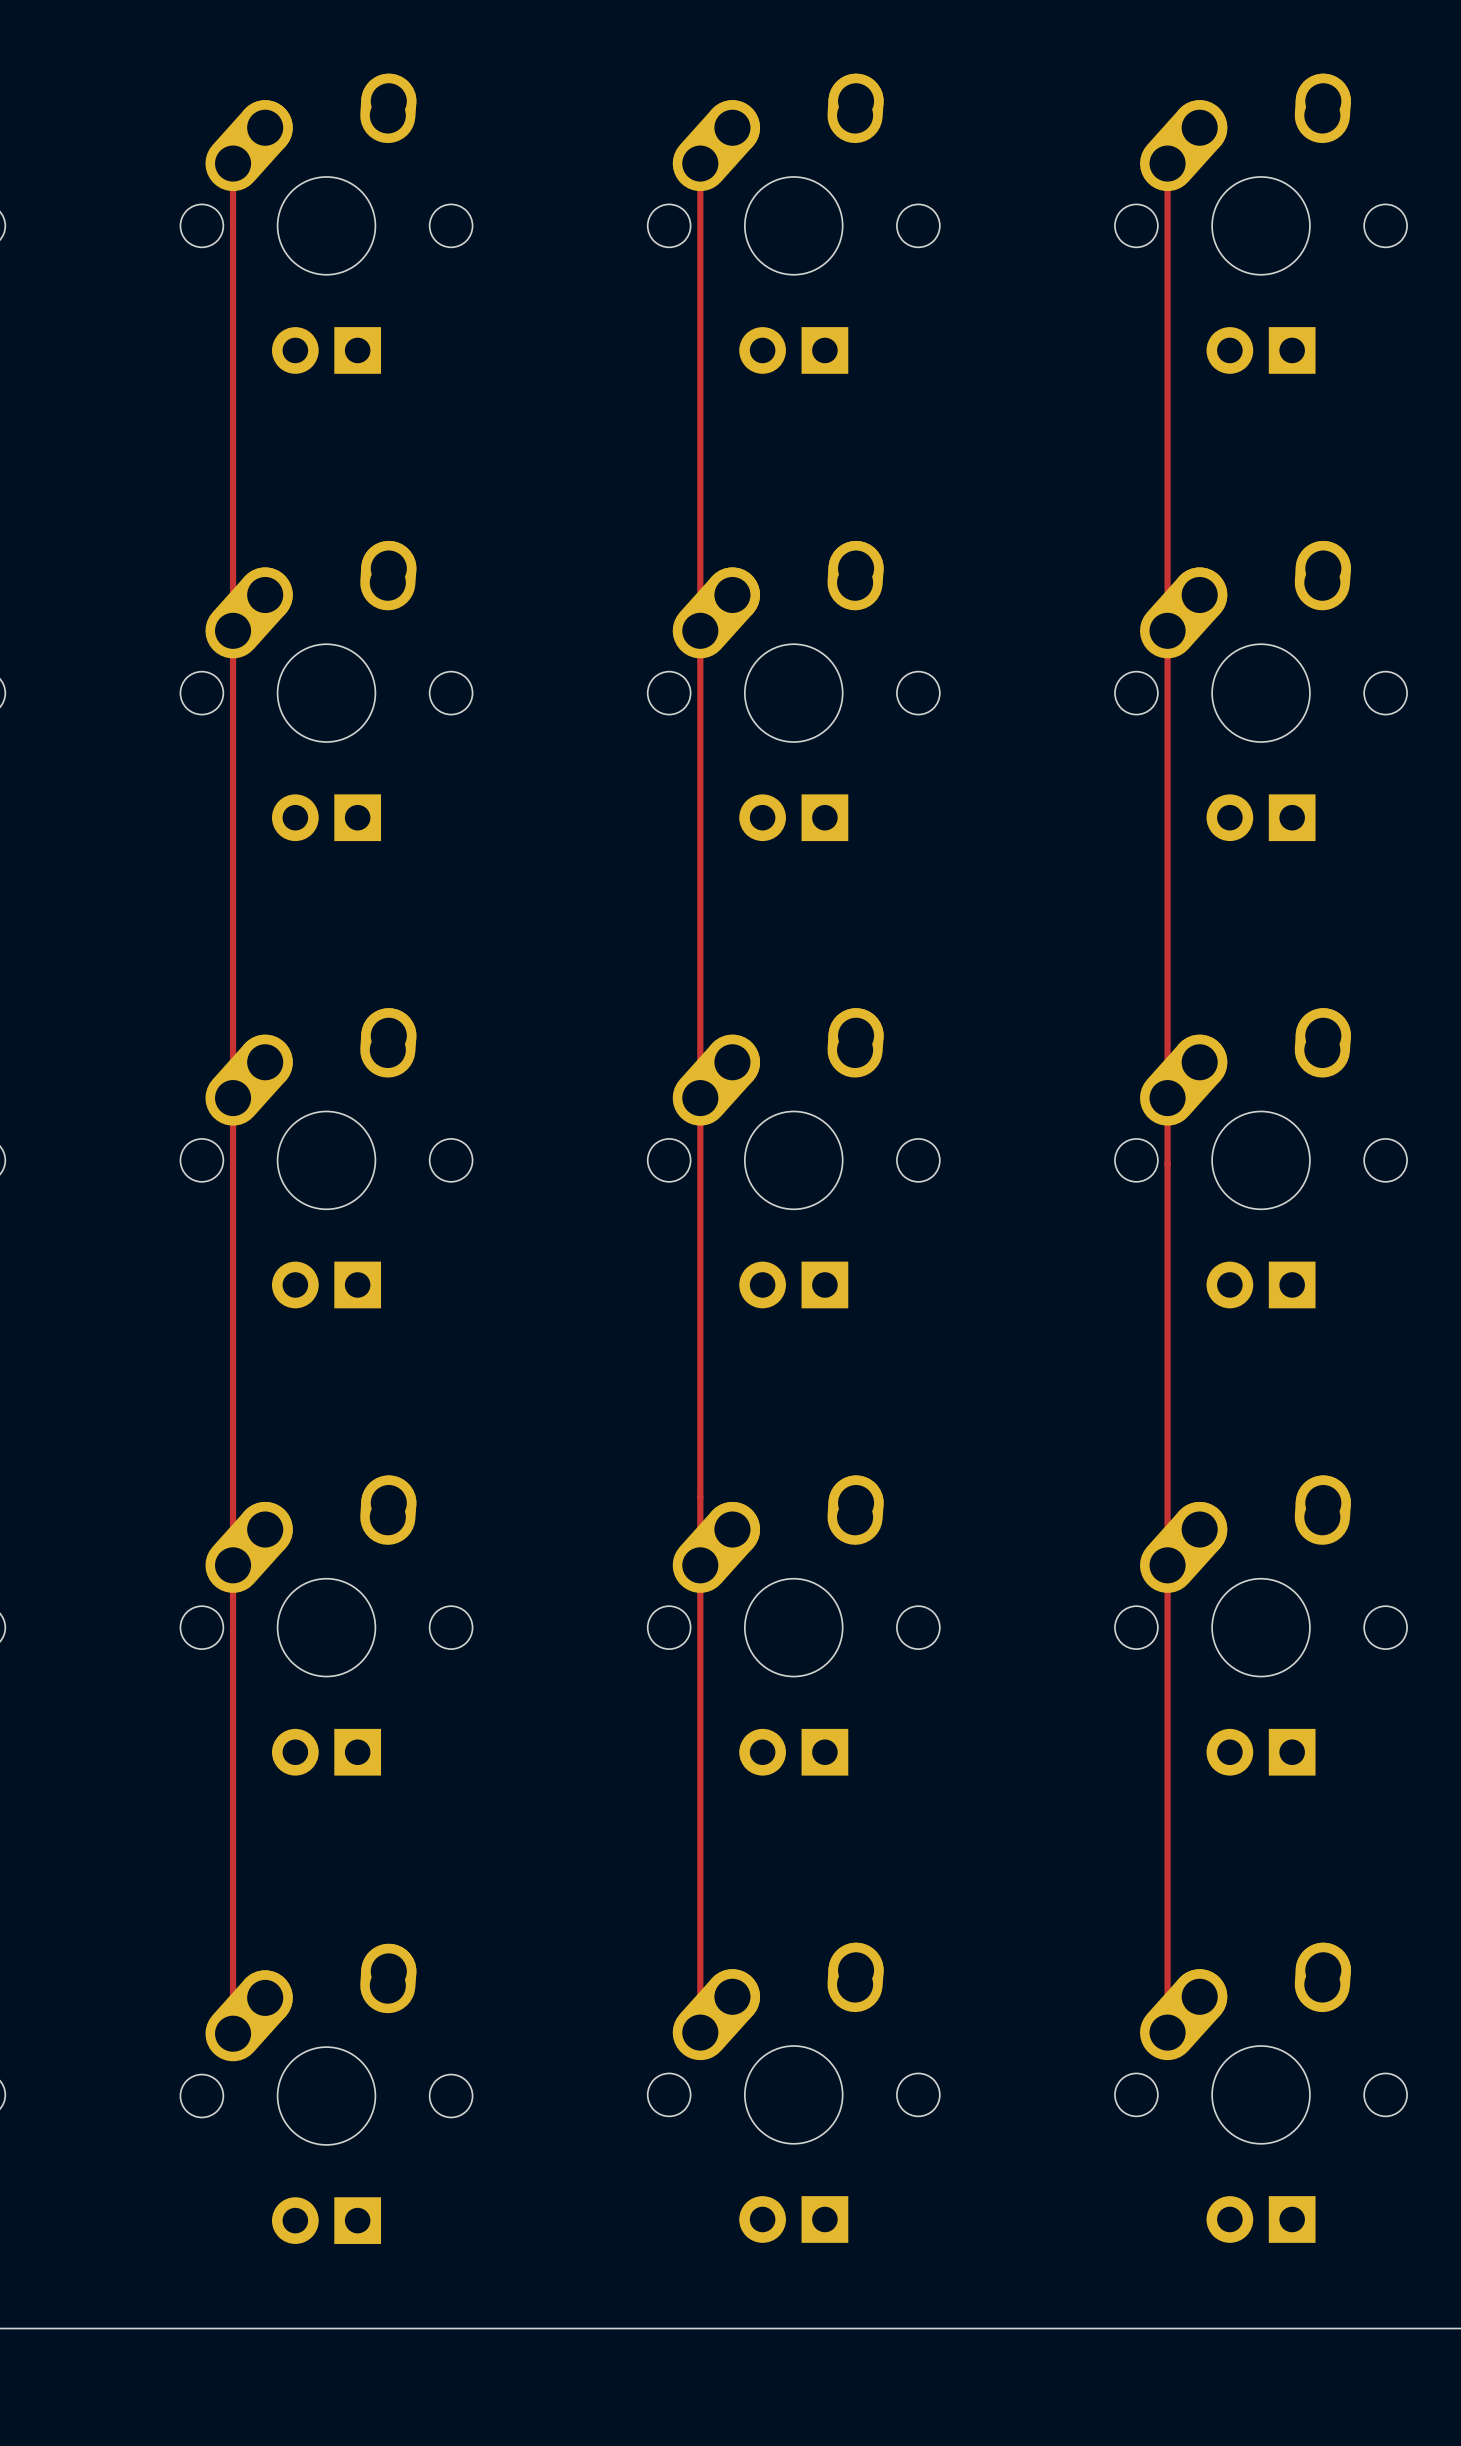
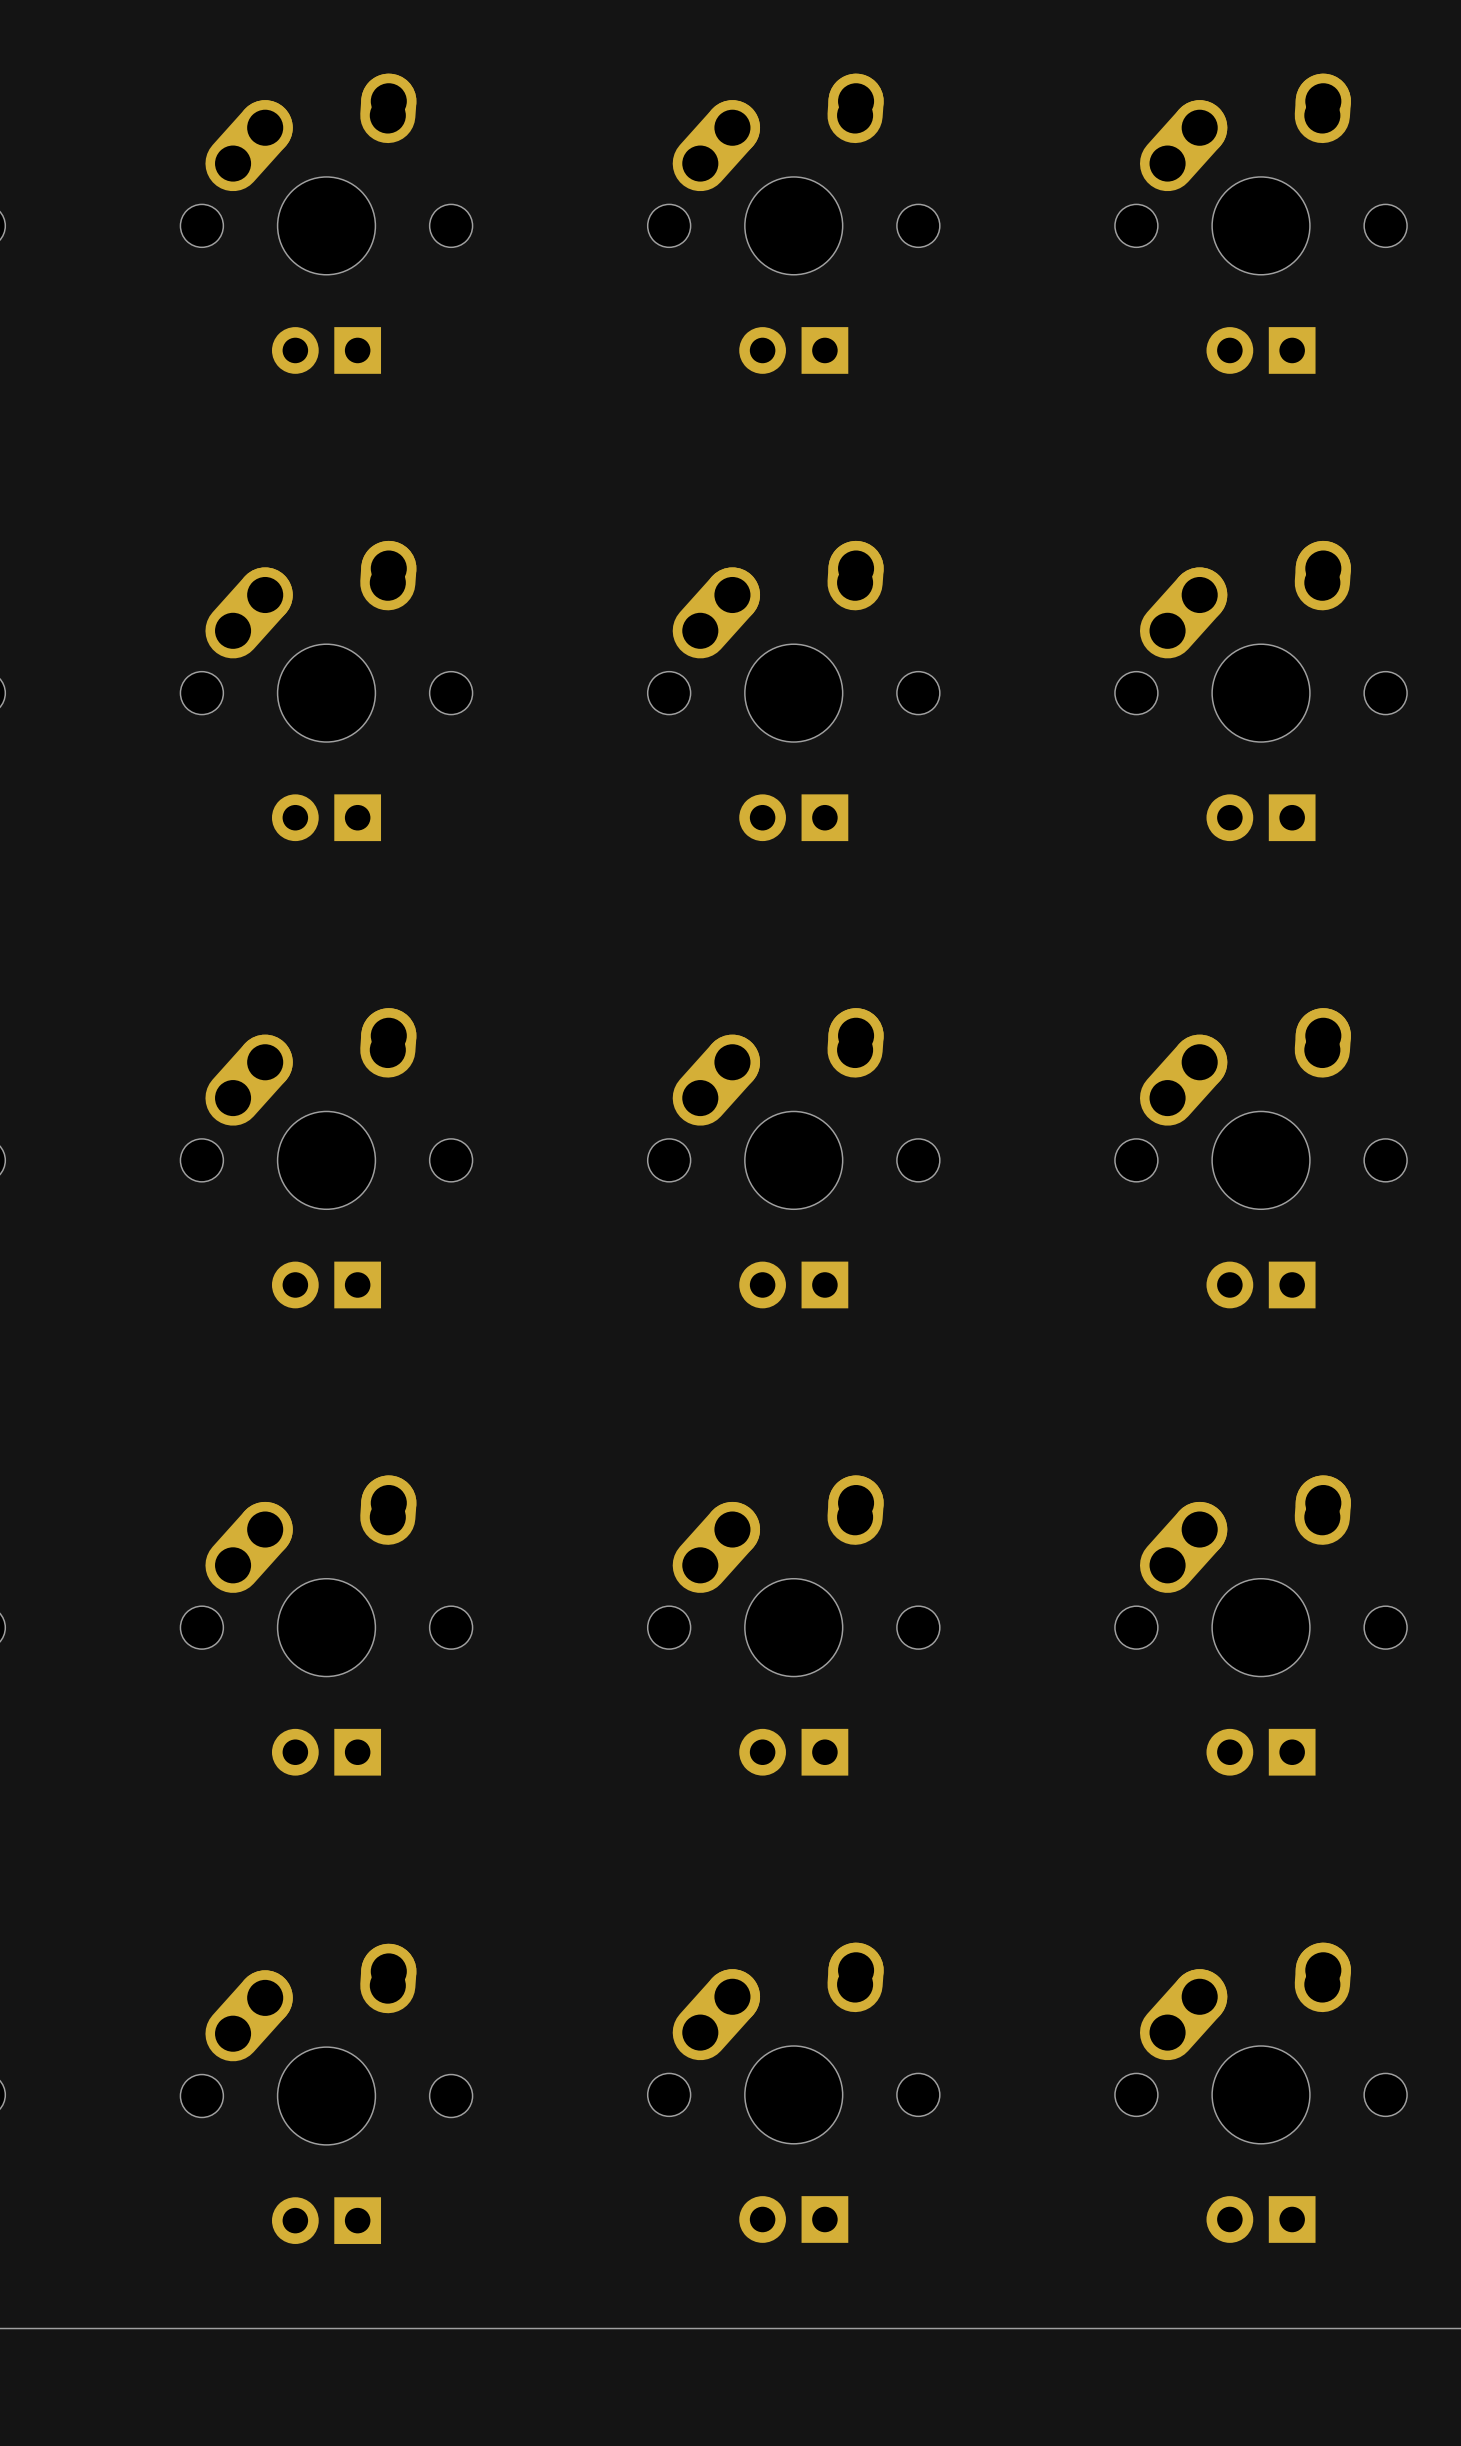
track: (233, 159) (233, 2033) -> none
track: (700, 163) (700, 2032) -> none
track: (1167, 163) (1167, 2032) -> none

